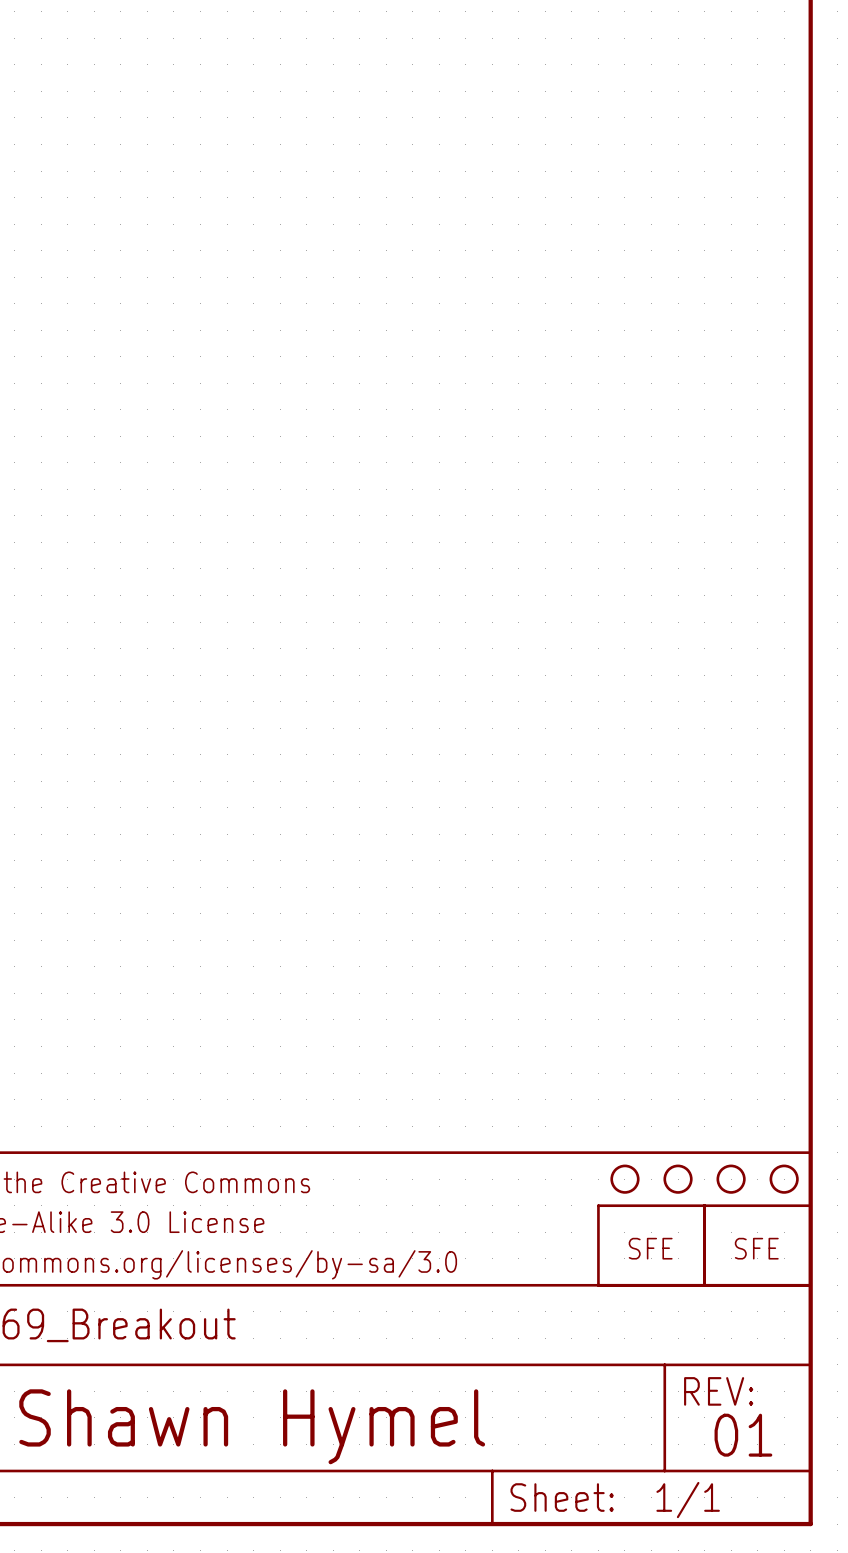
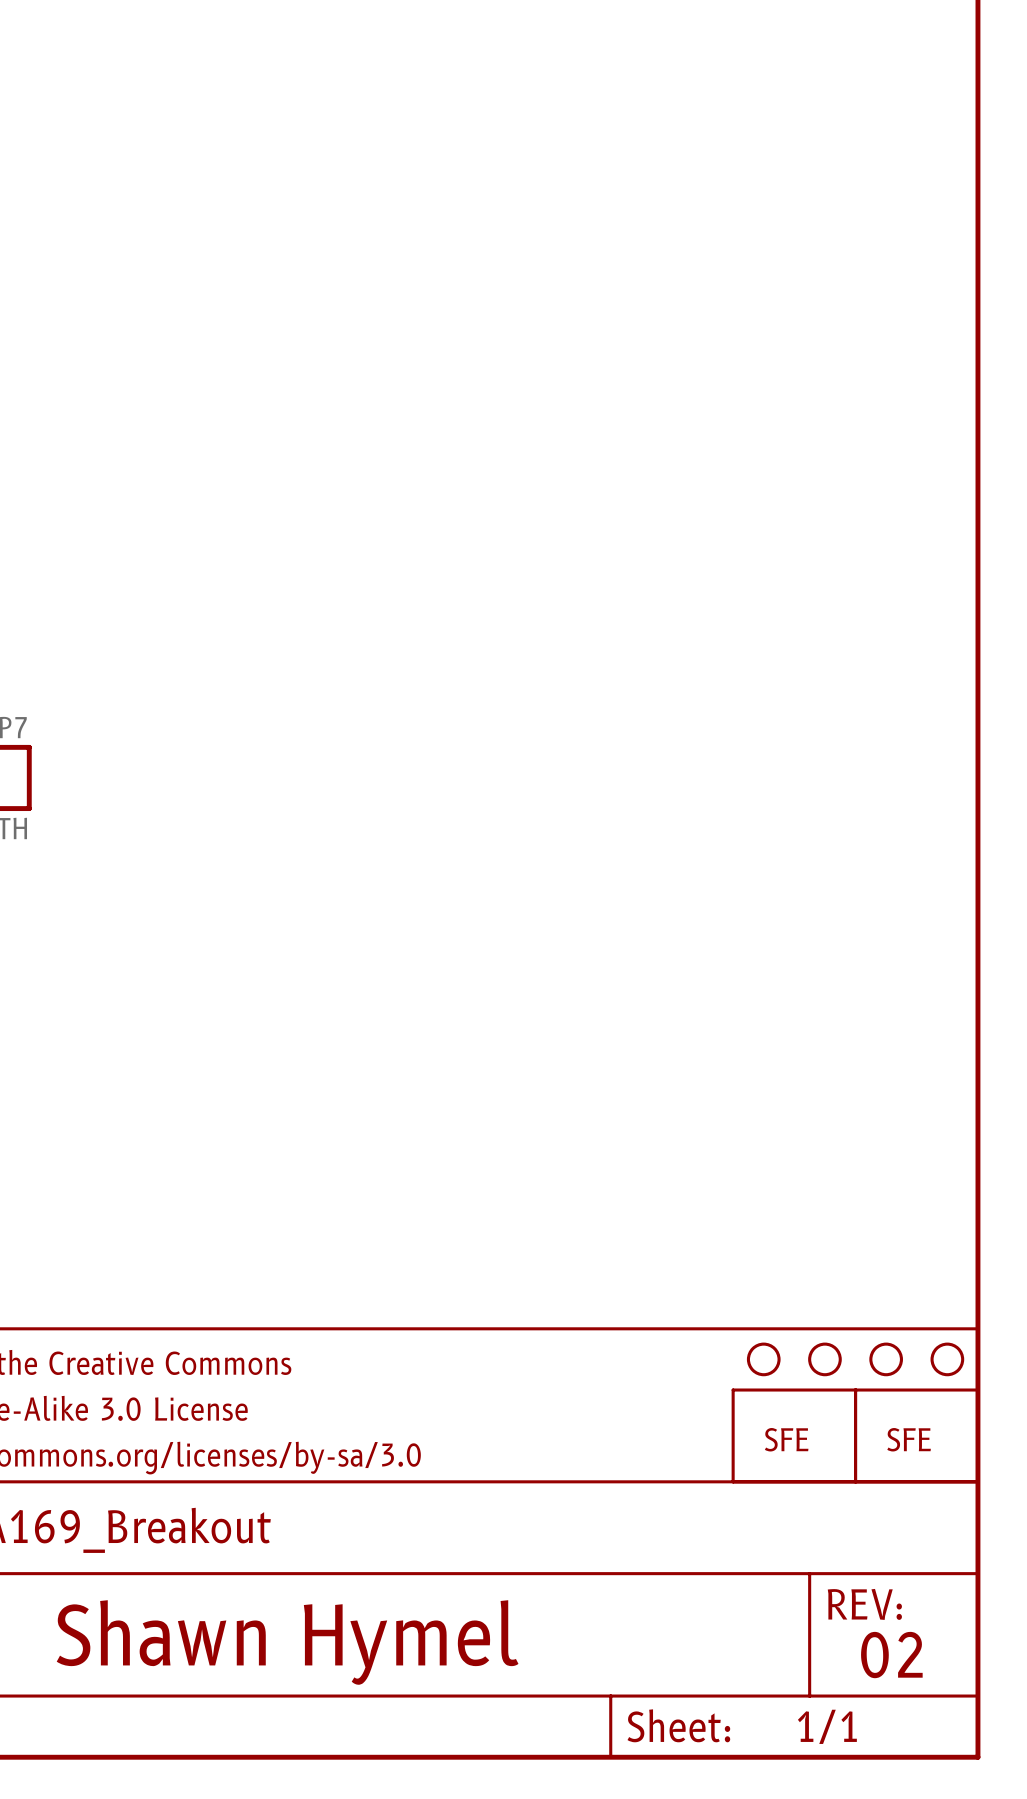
text: 01 (743, 1435) -> 02 (891, 1655)

